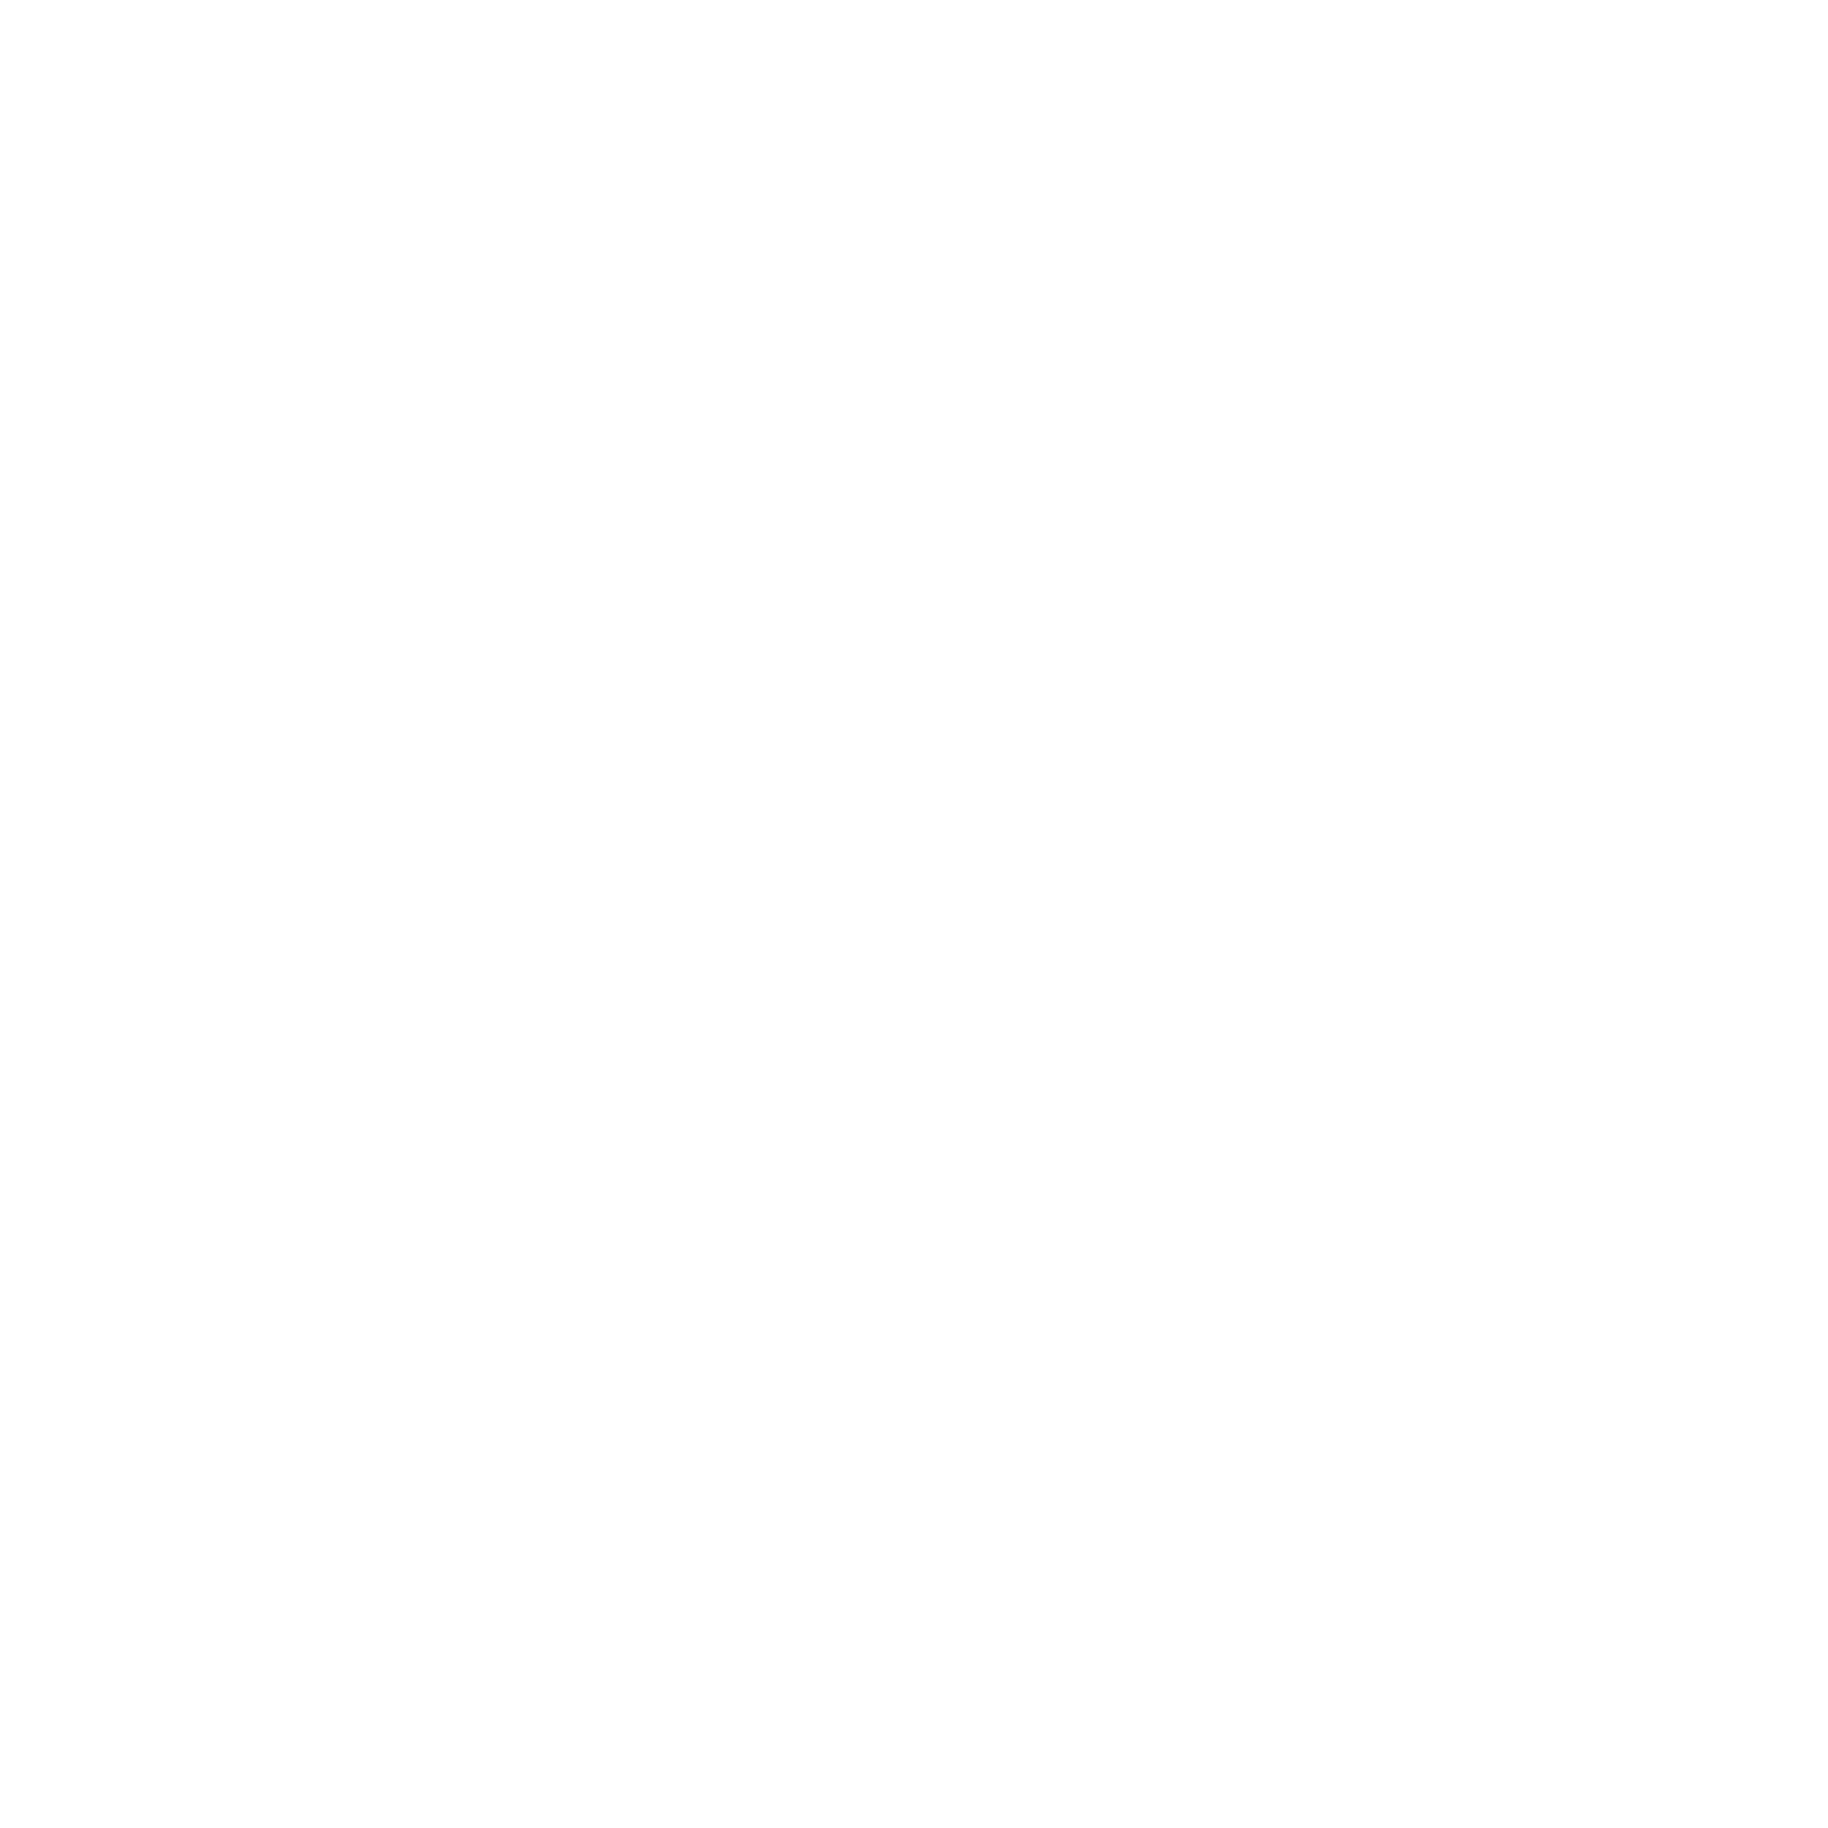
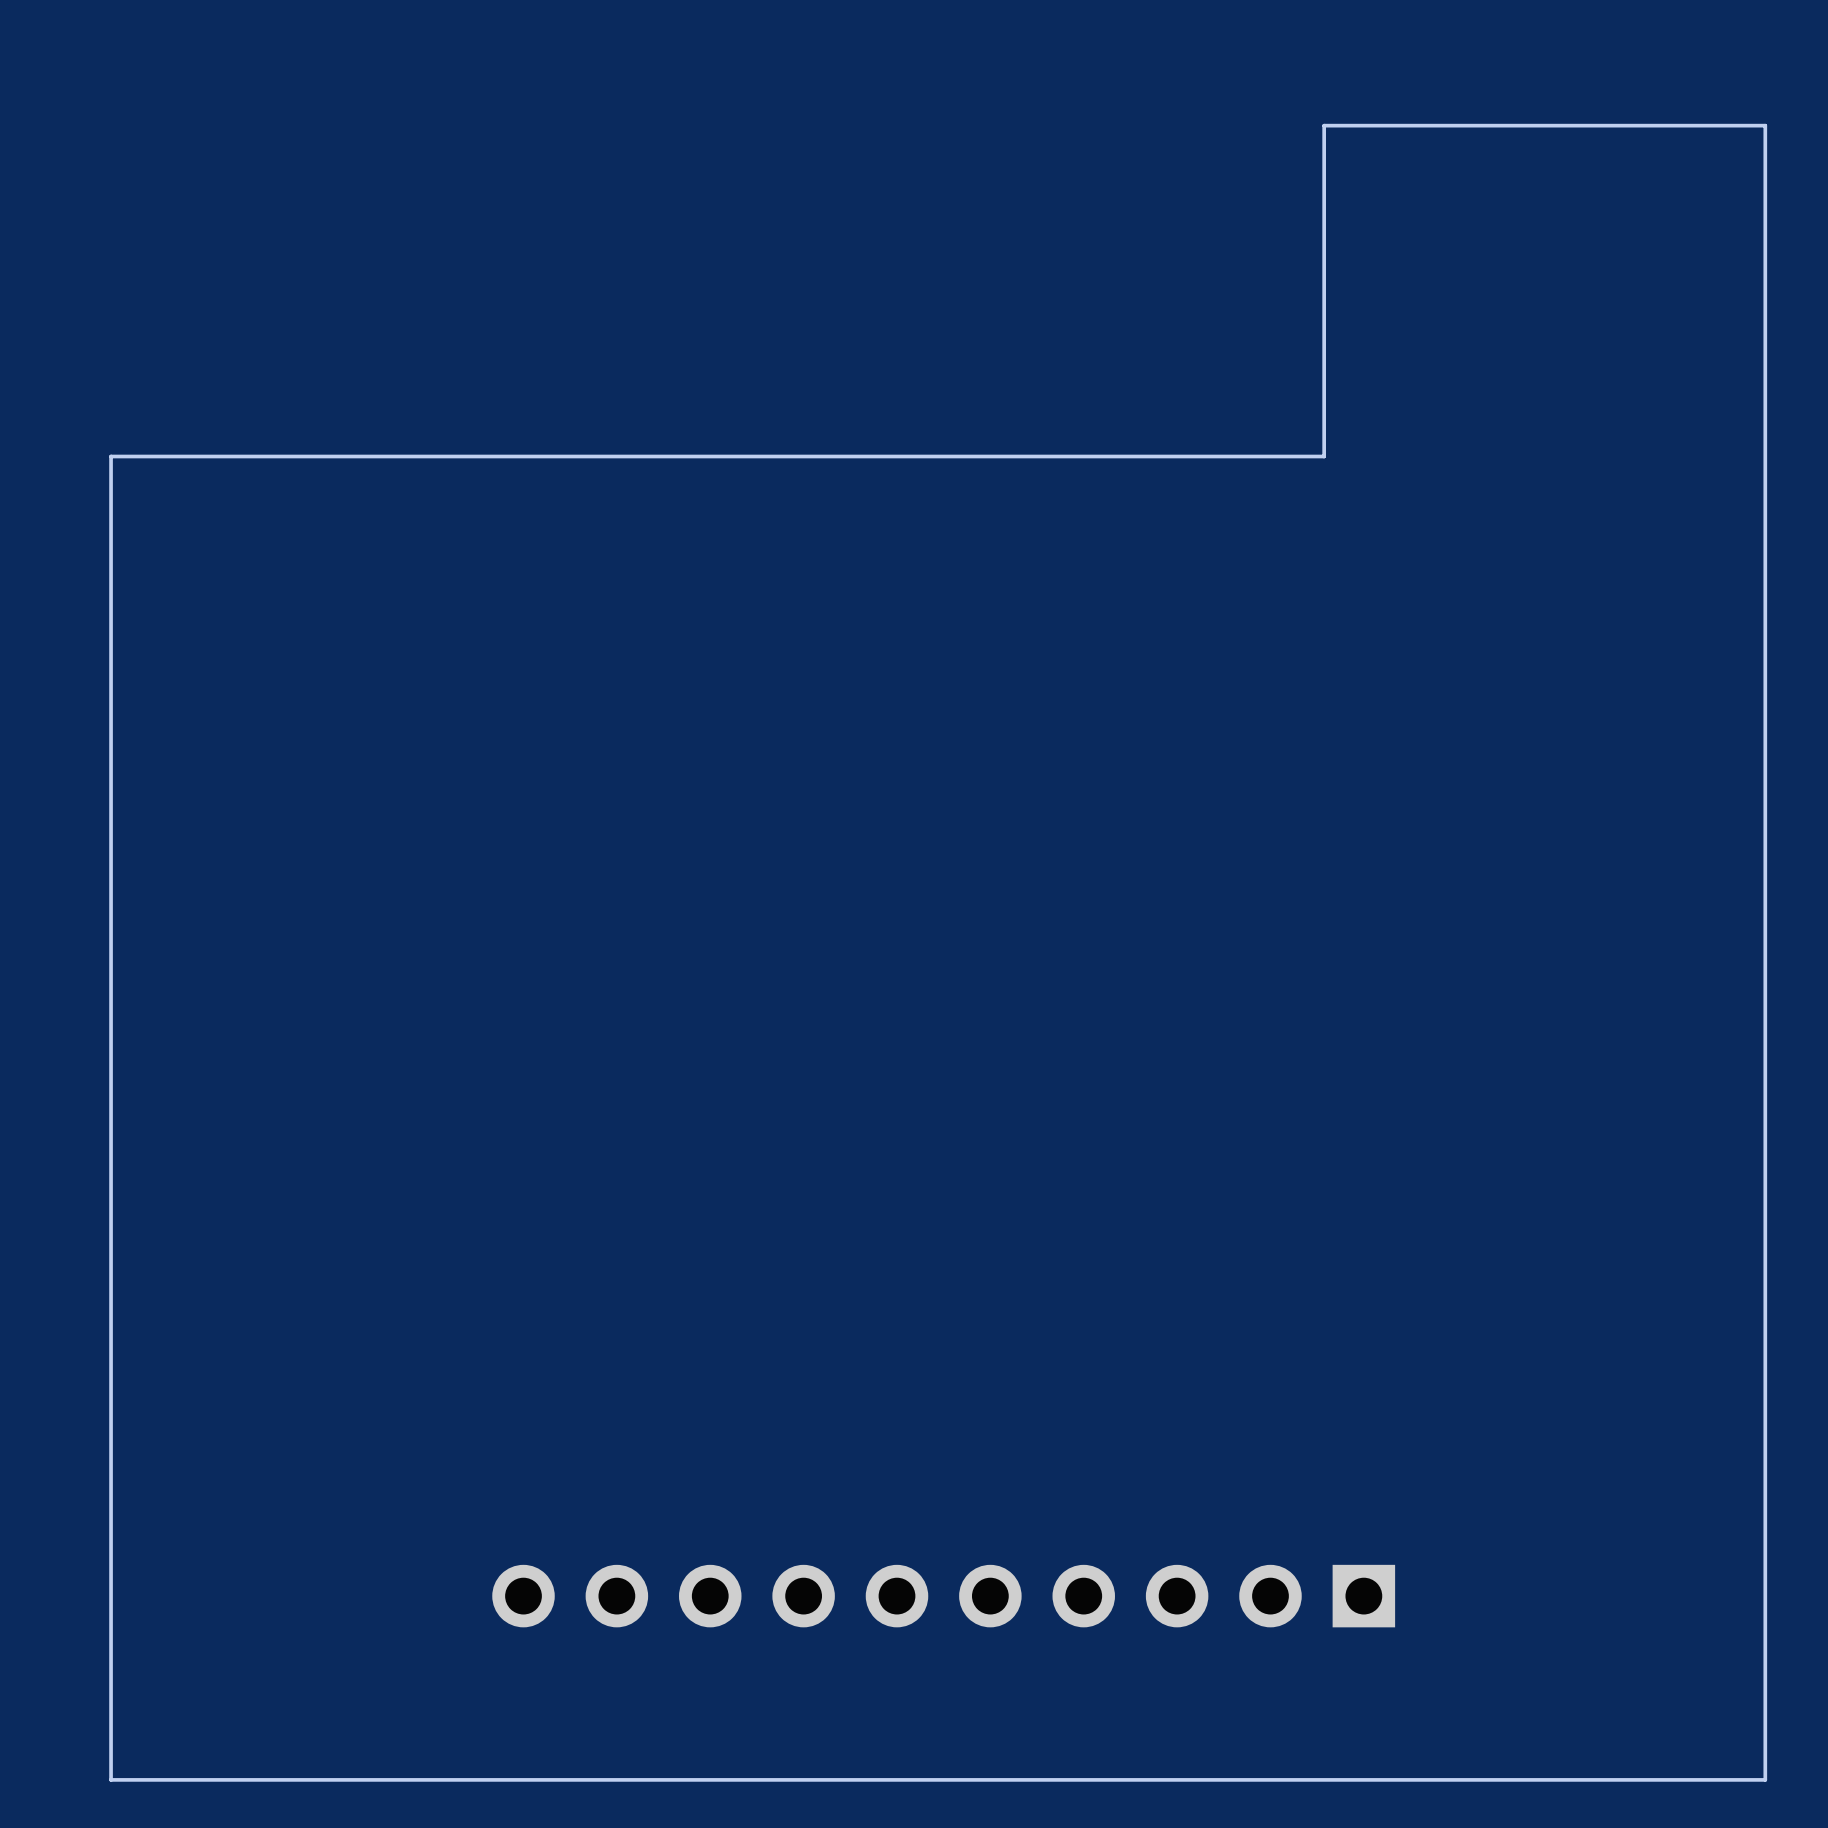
board edge: none -> (1765, 125) (1324, 125) (1324, 456) (111, 456) (111, 1779) (1765, 1779) (1765, 125)
part: none -> (943, 1596)

